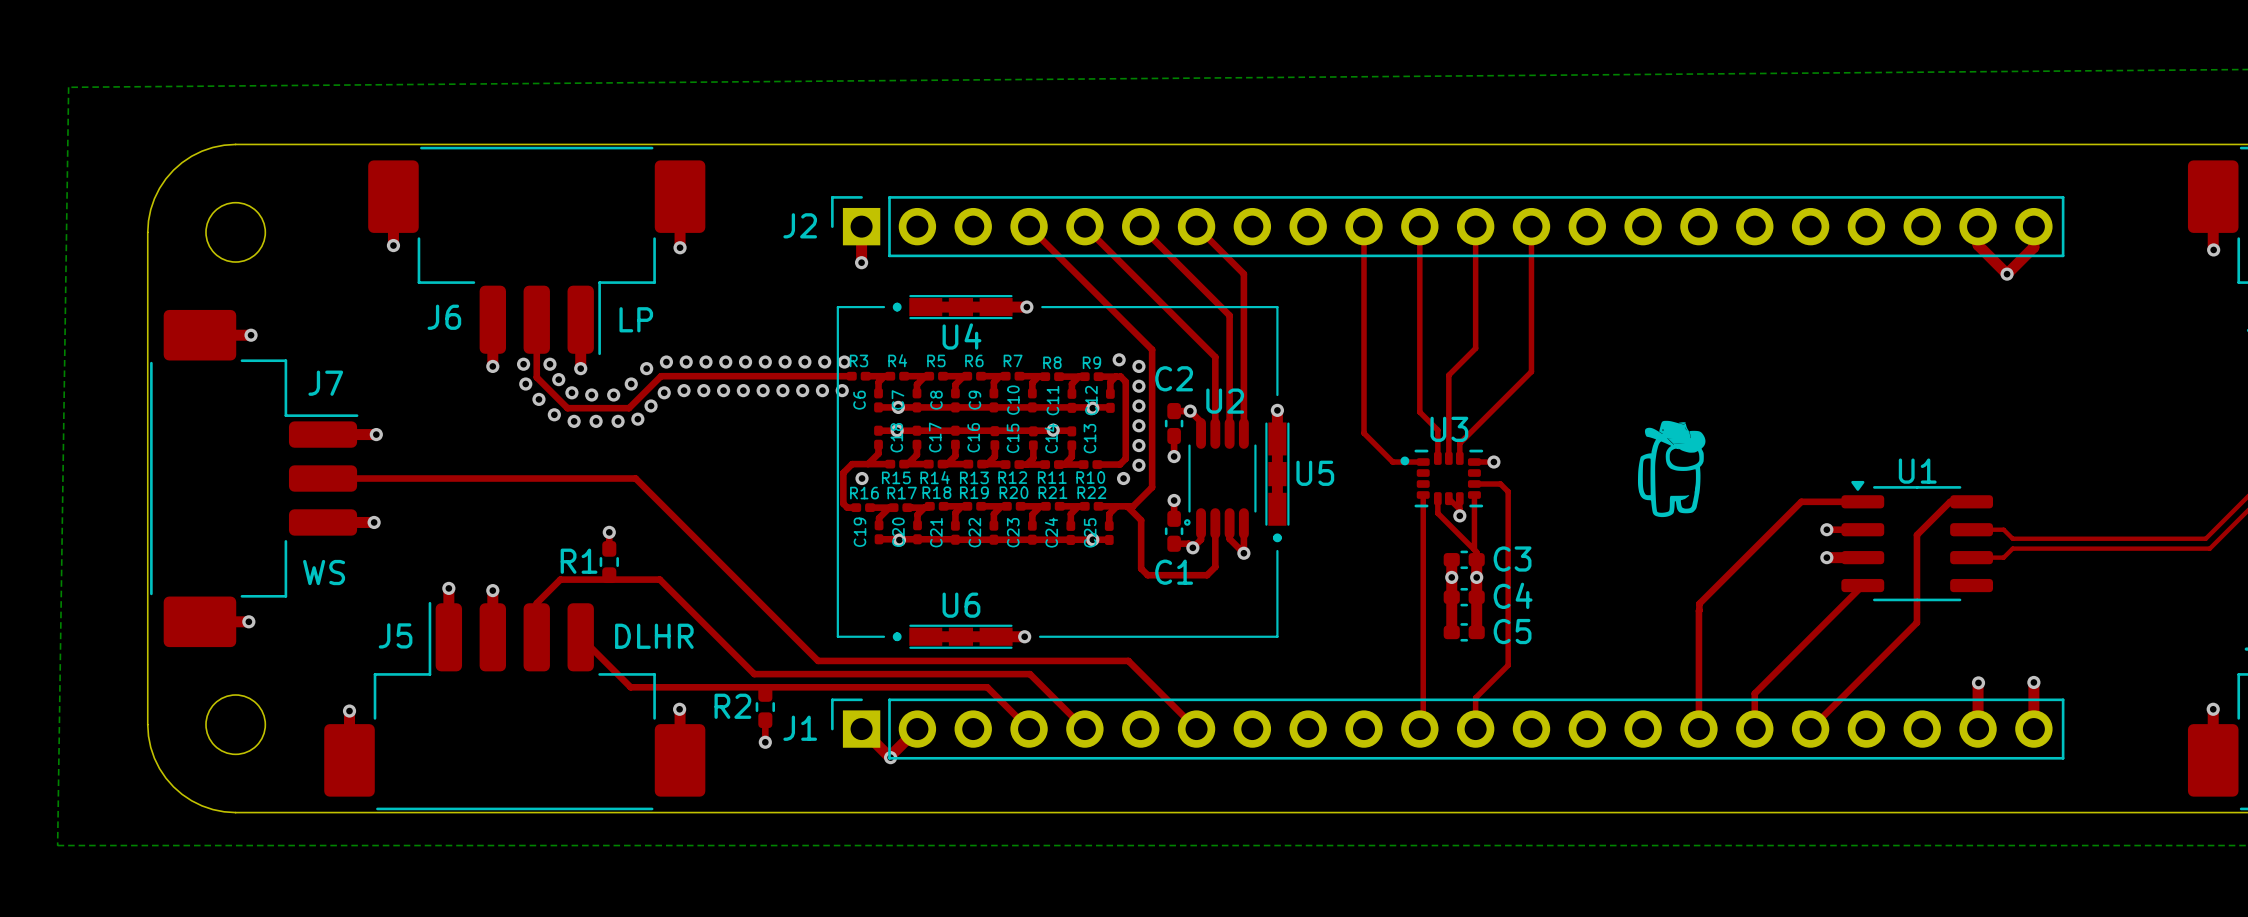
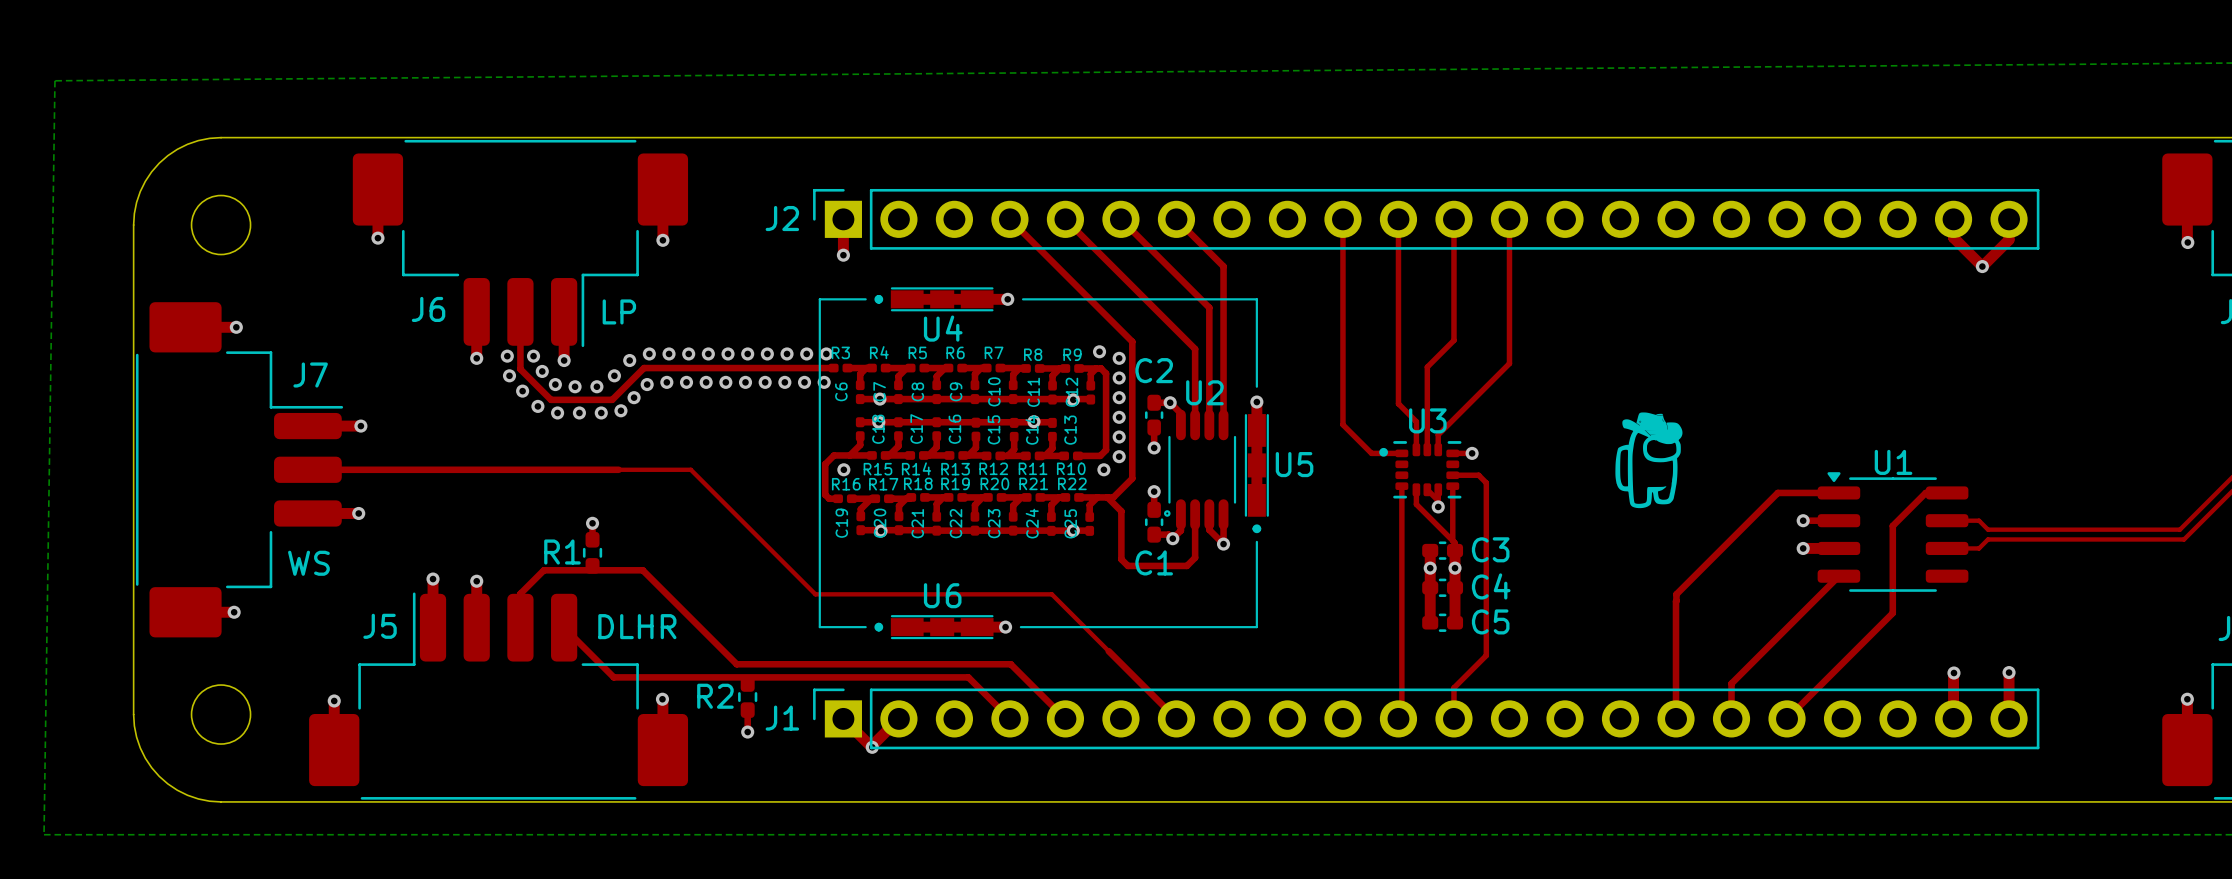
top track: (635, 478) (818, 660) (1128, 660) -> (618, 469) (690, 469) (815, 594) (1051, 594) (1108, 651)

